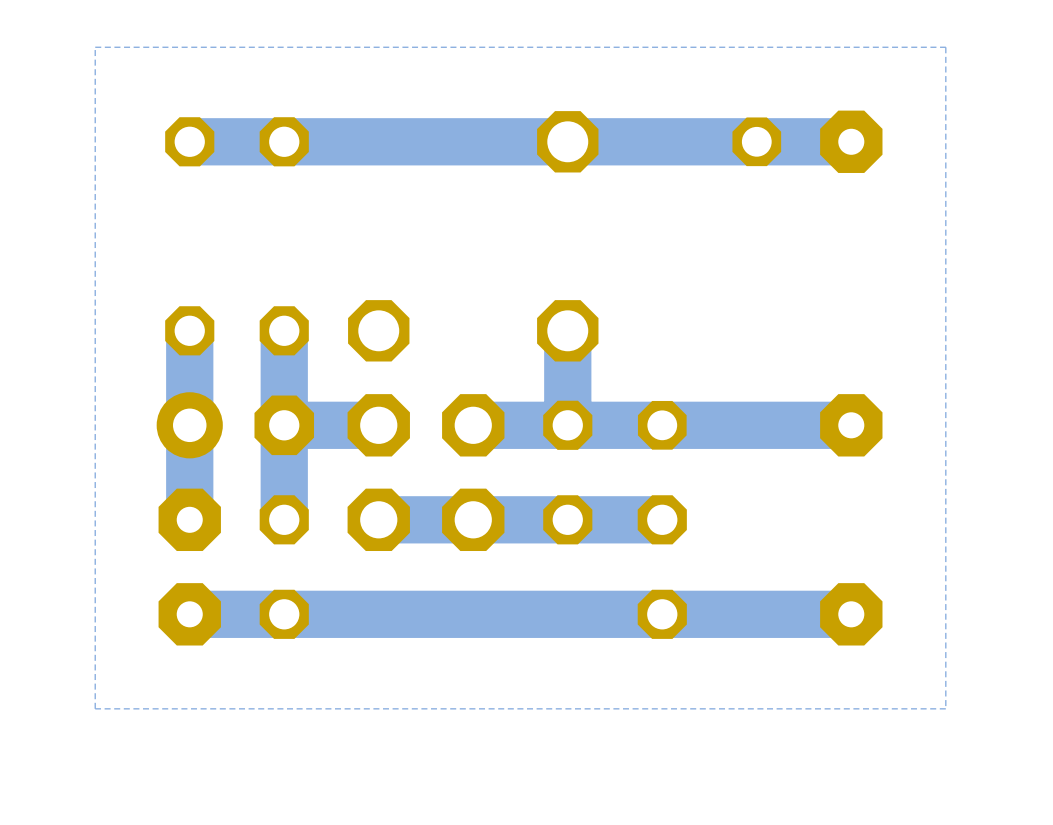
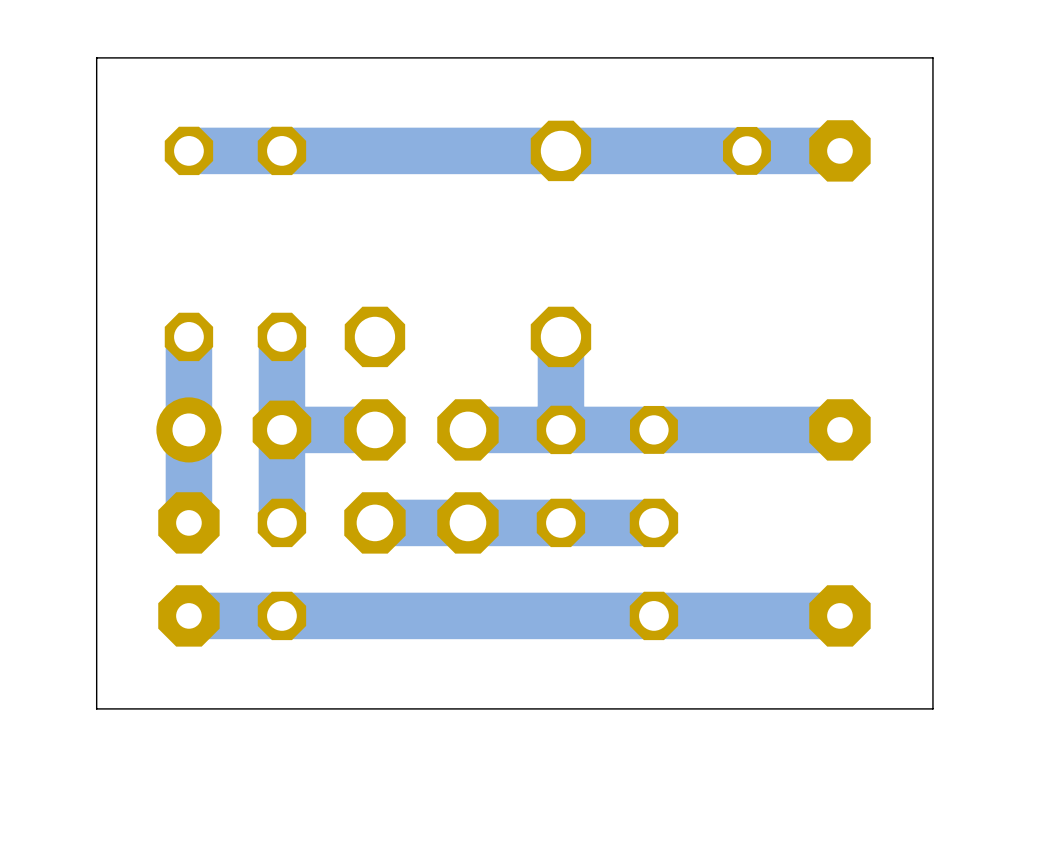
zone outline: (945, 47) (945, 708) (95, 708) (95, 47) (945, 47) -> none
board edge: none -> (932, 57) (96, 57) (96, 708) (932, 708) (932, 57)

